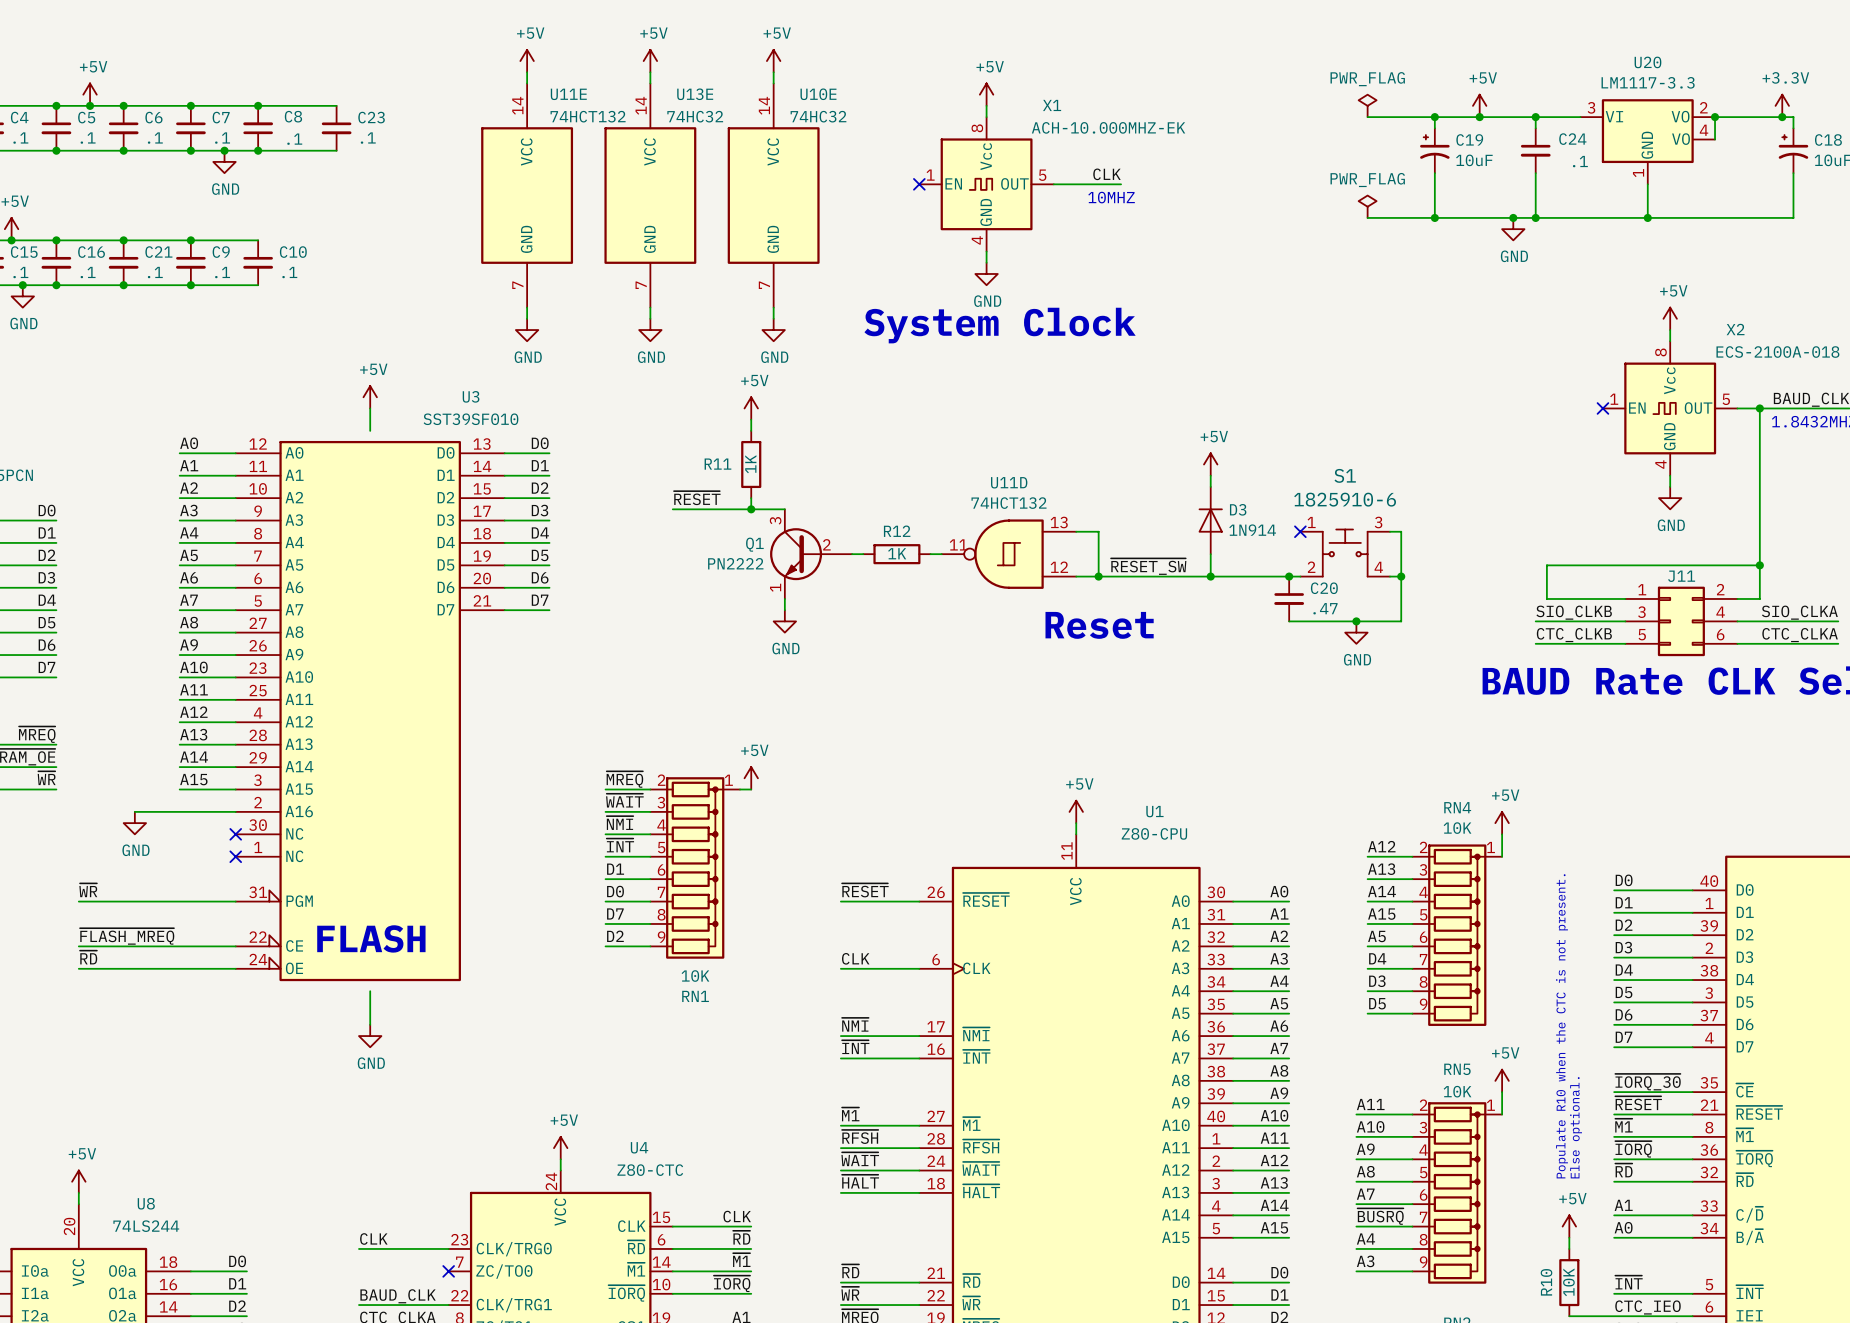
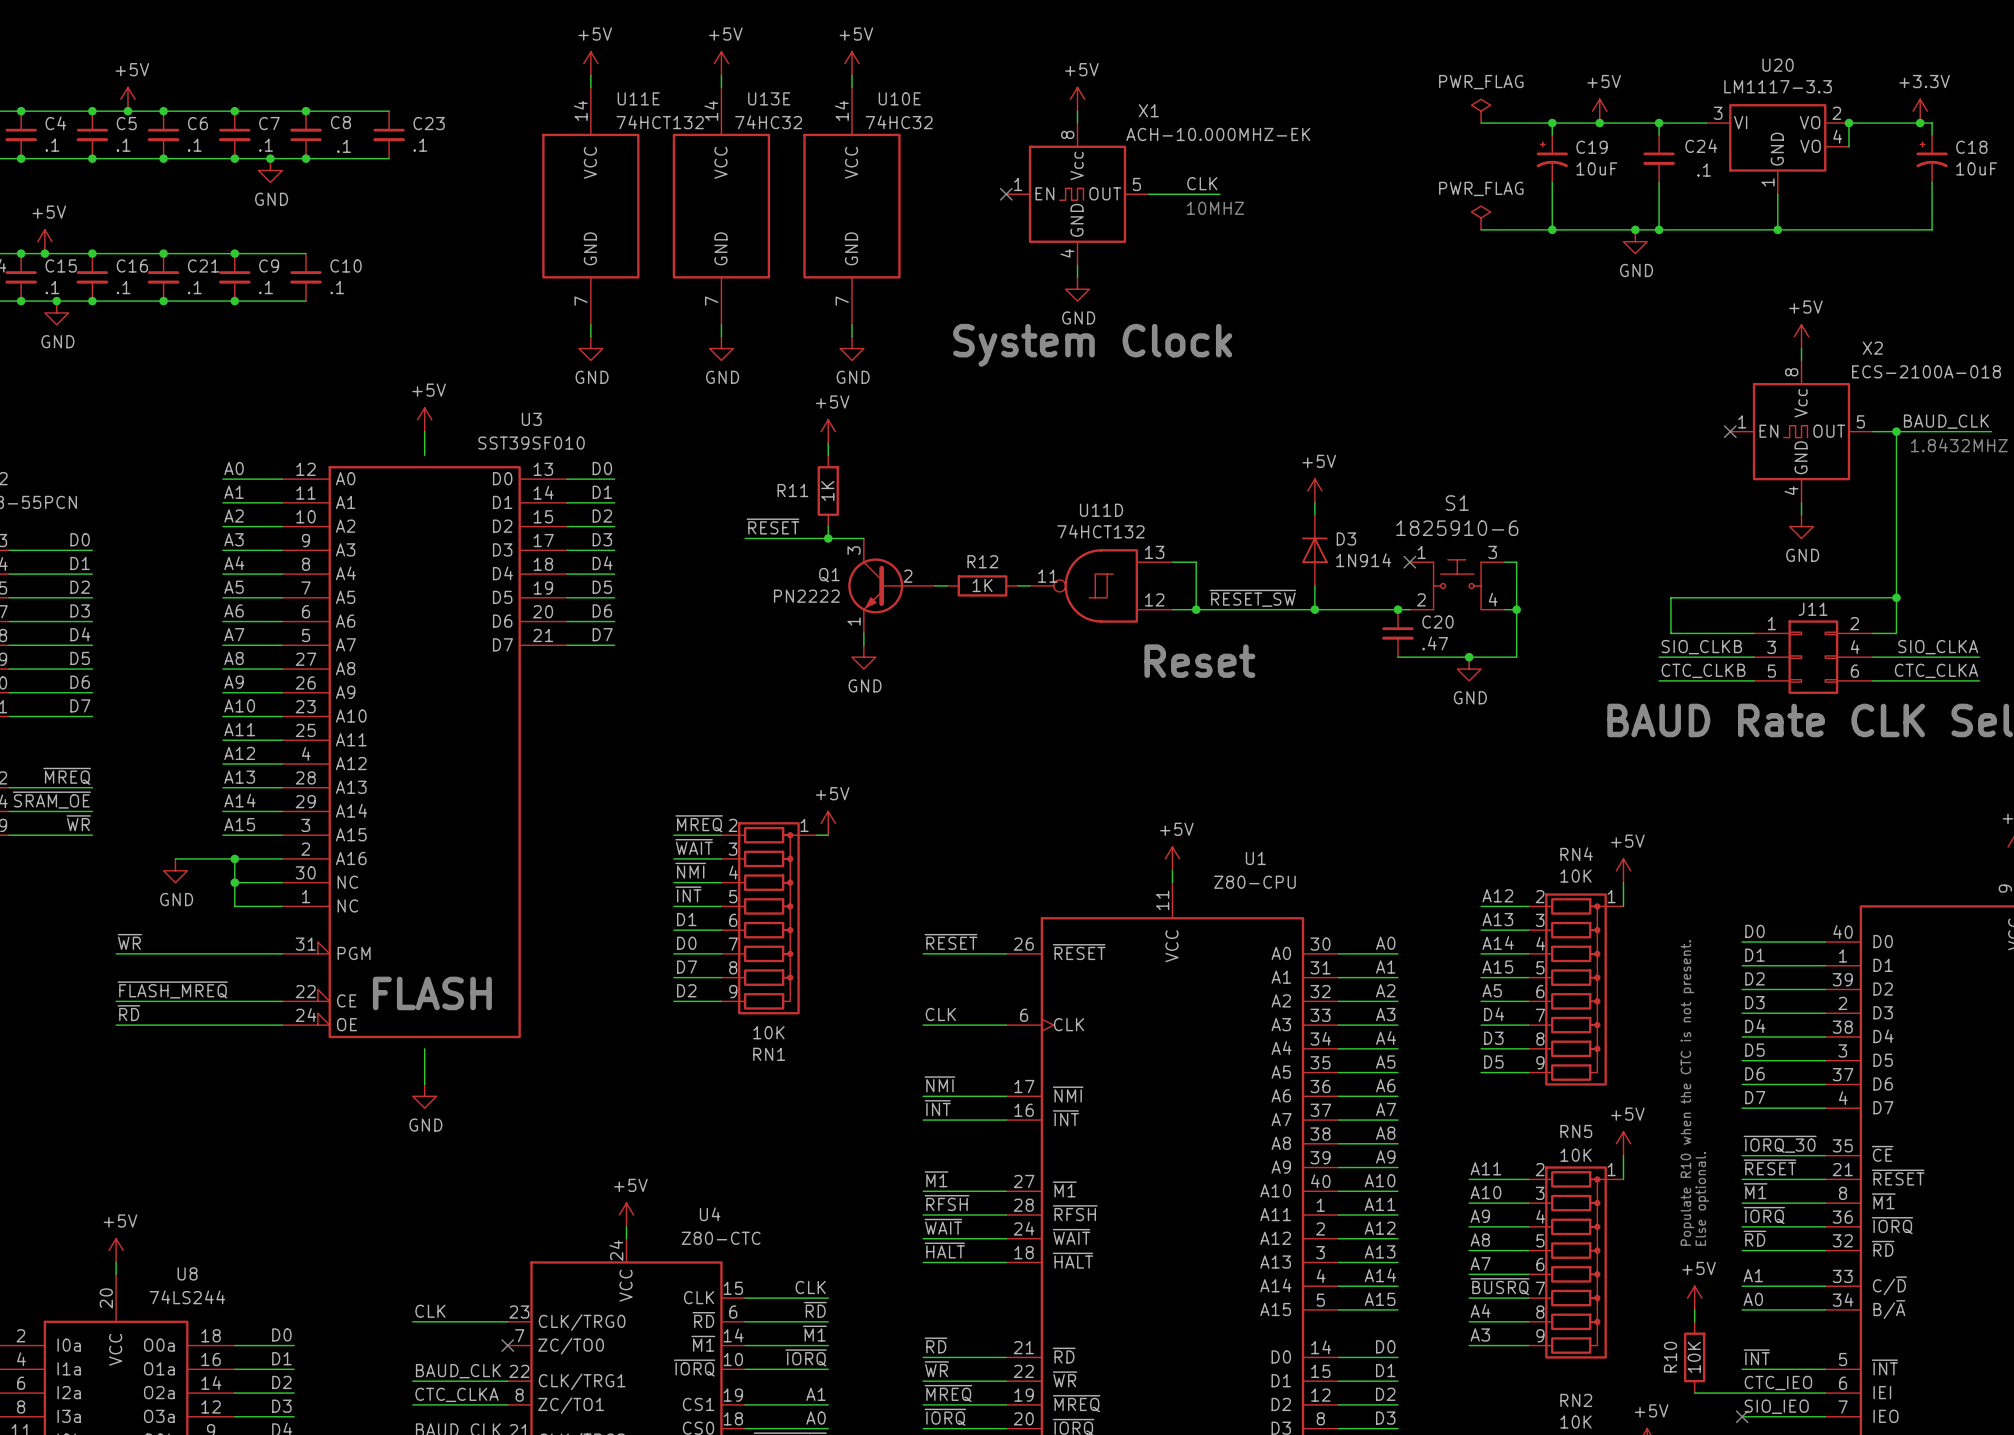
wire: none -> (234, 858) (234, 906) (282, 906)
junction: none -> (234, 858)
wire: none -> (234, 882) (282, 882)
junction: none -> (234, 882)
no-connect mark: (235, 834) -> none
no-connect mark: (235, 856) -> none

